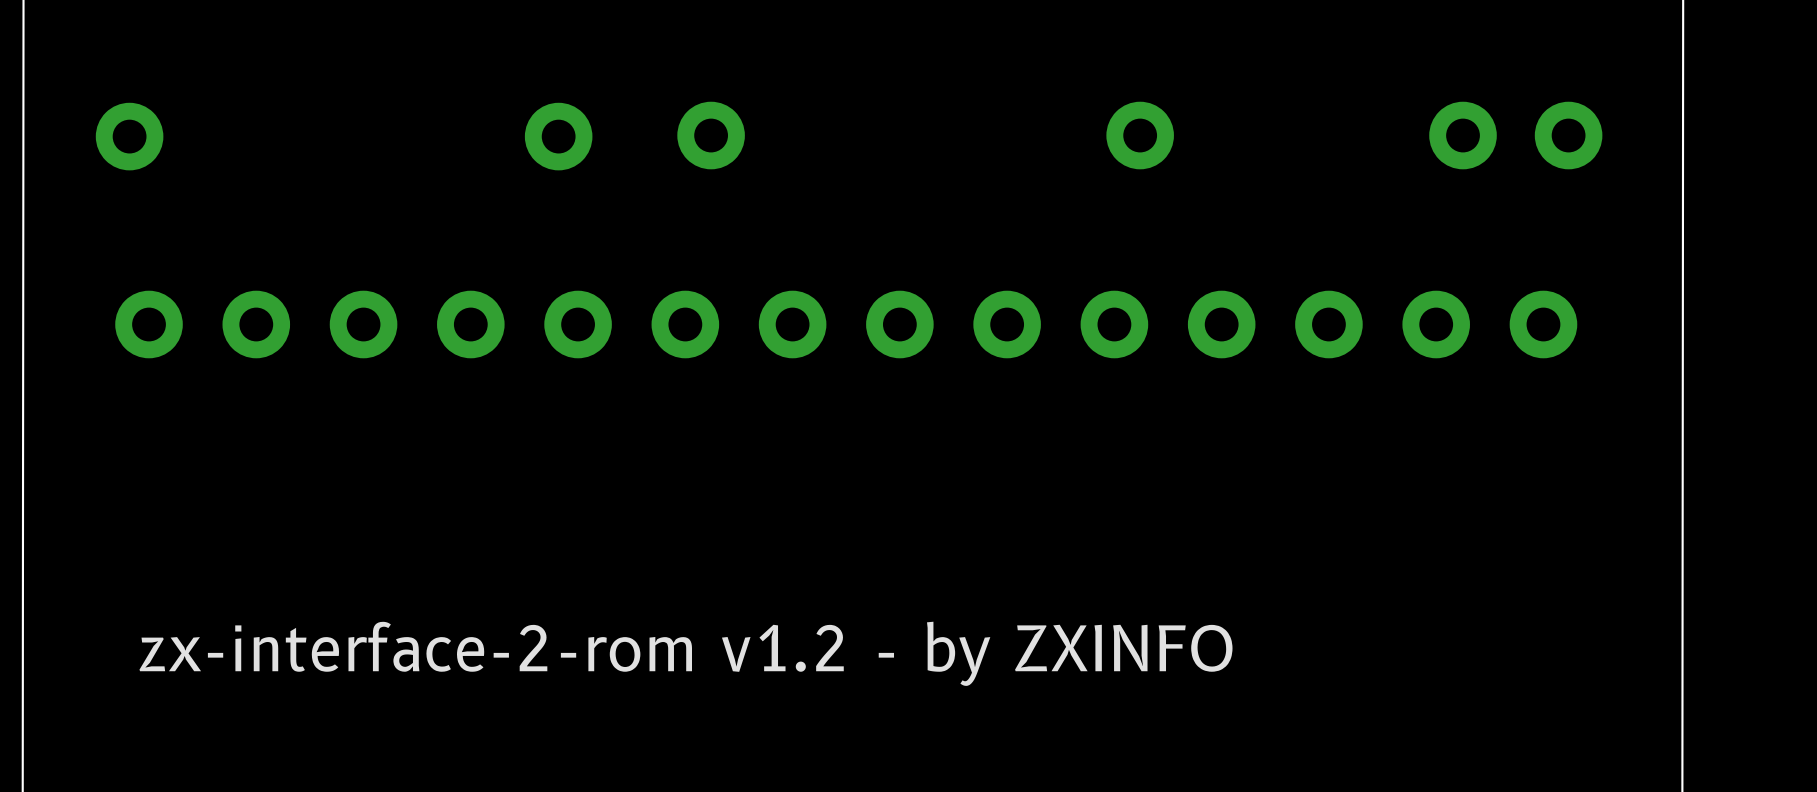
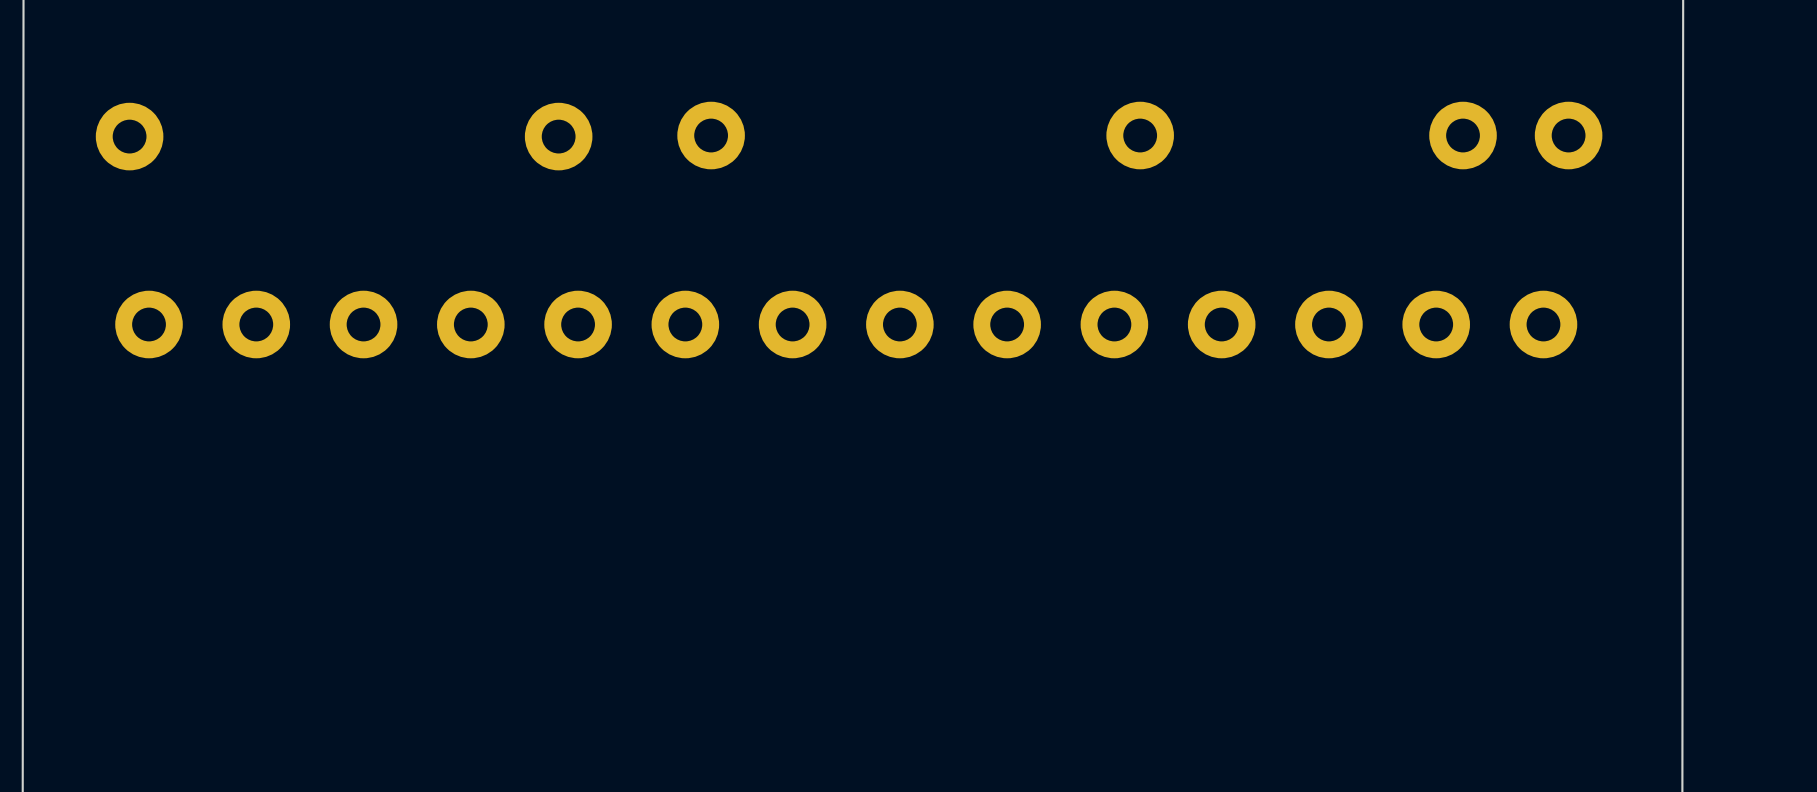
text: zx-interface-2-rom v1.2 - by ZXINFO (685, 653) -> none

